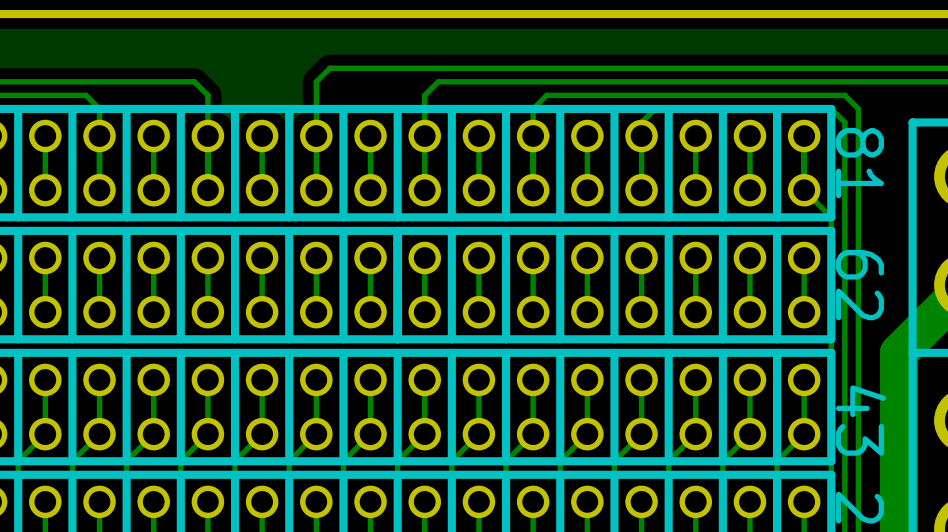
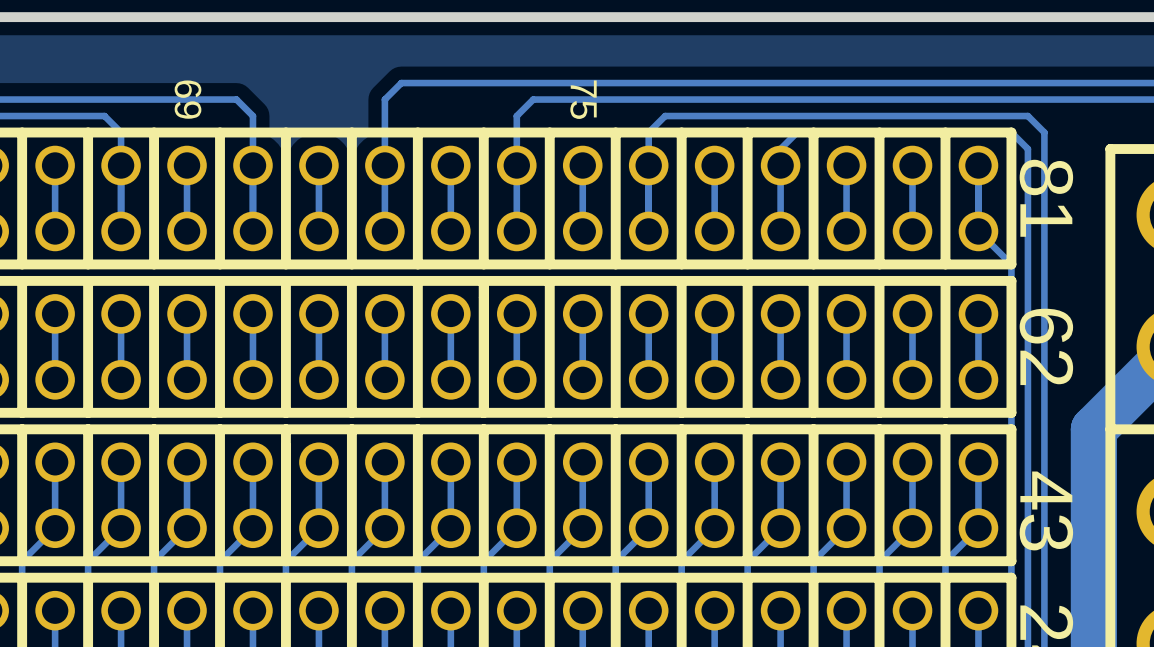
text: none -> 69 (188, 99)
text: none -> 75 (583, 99)

